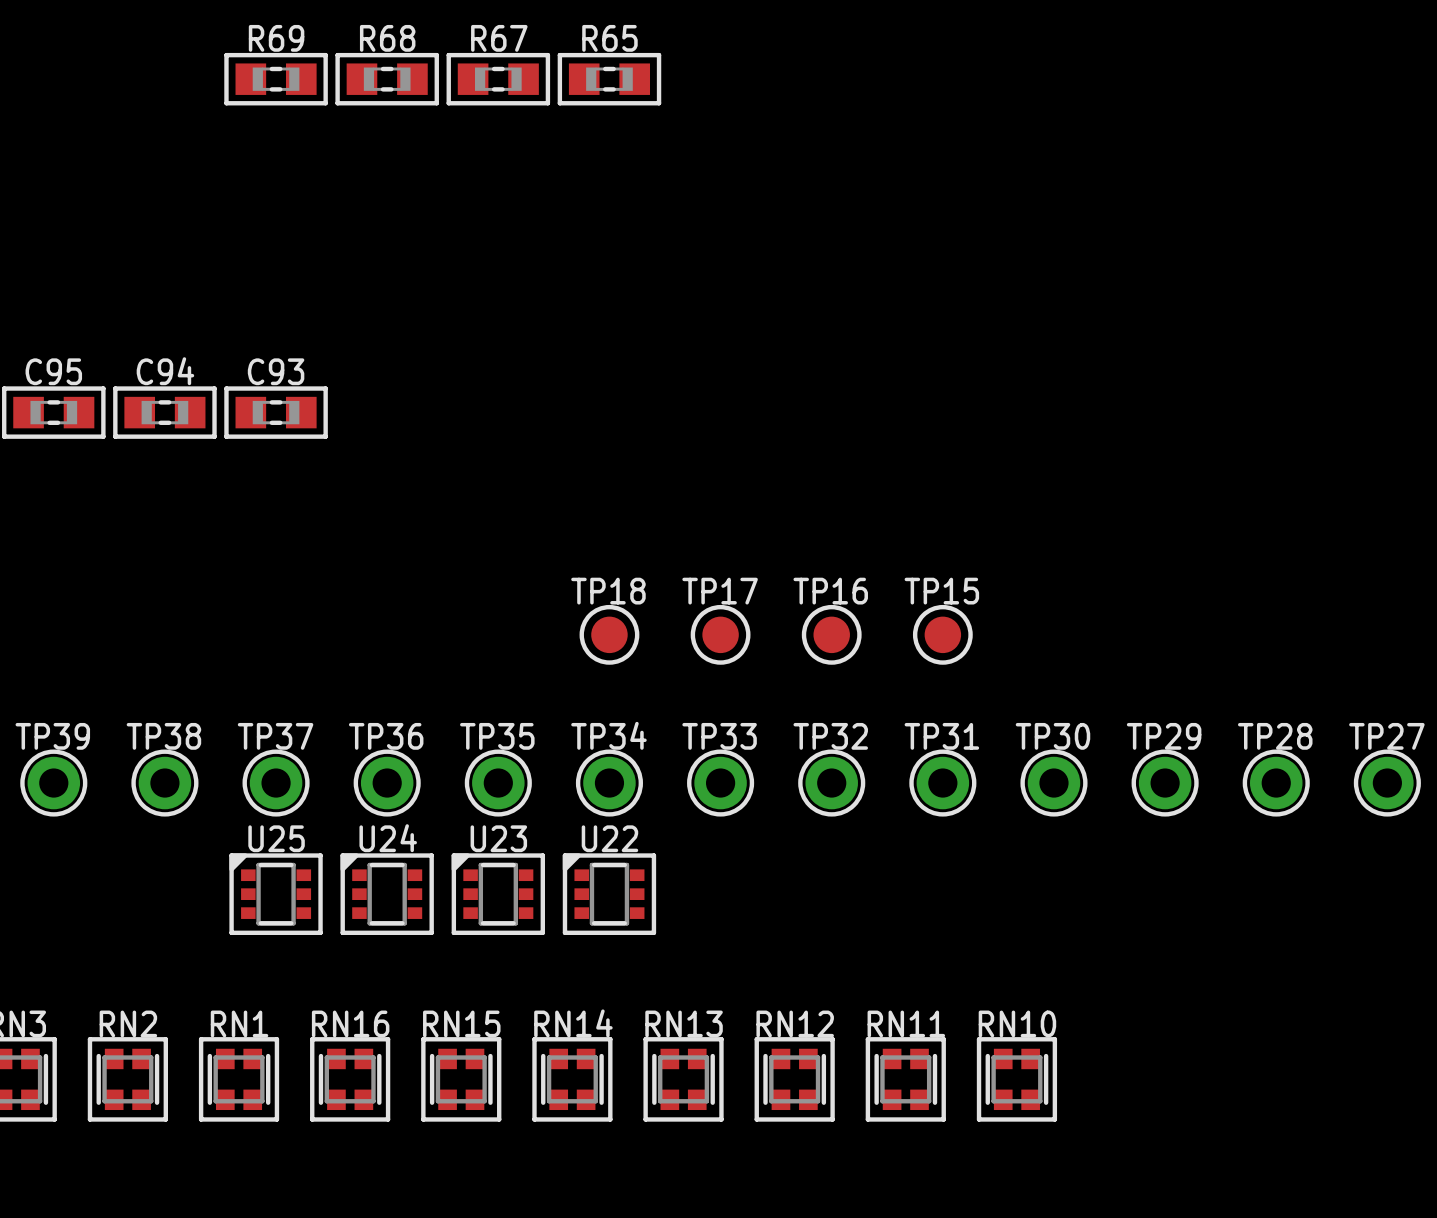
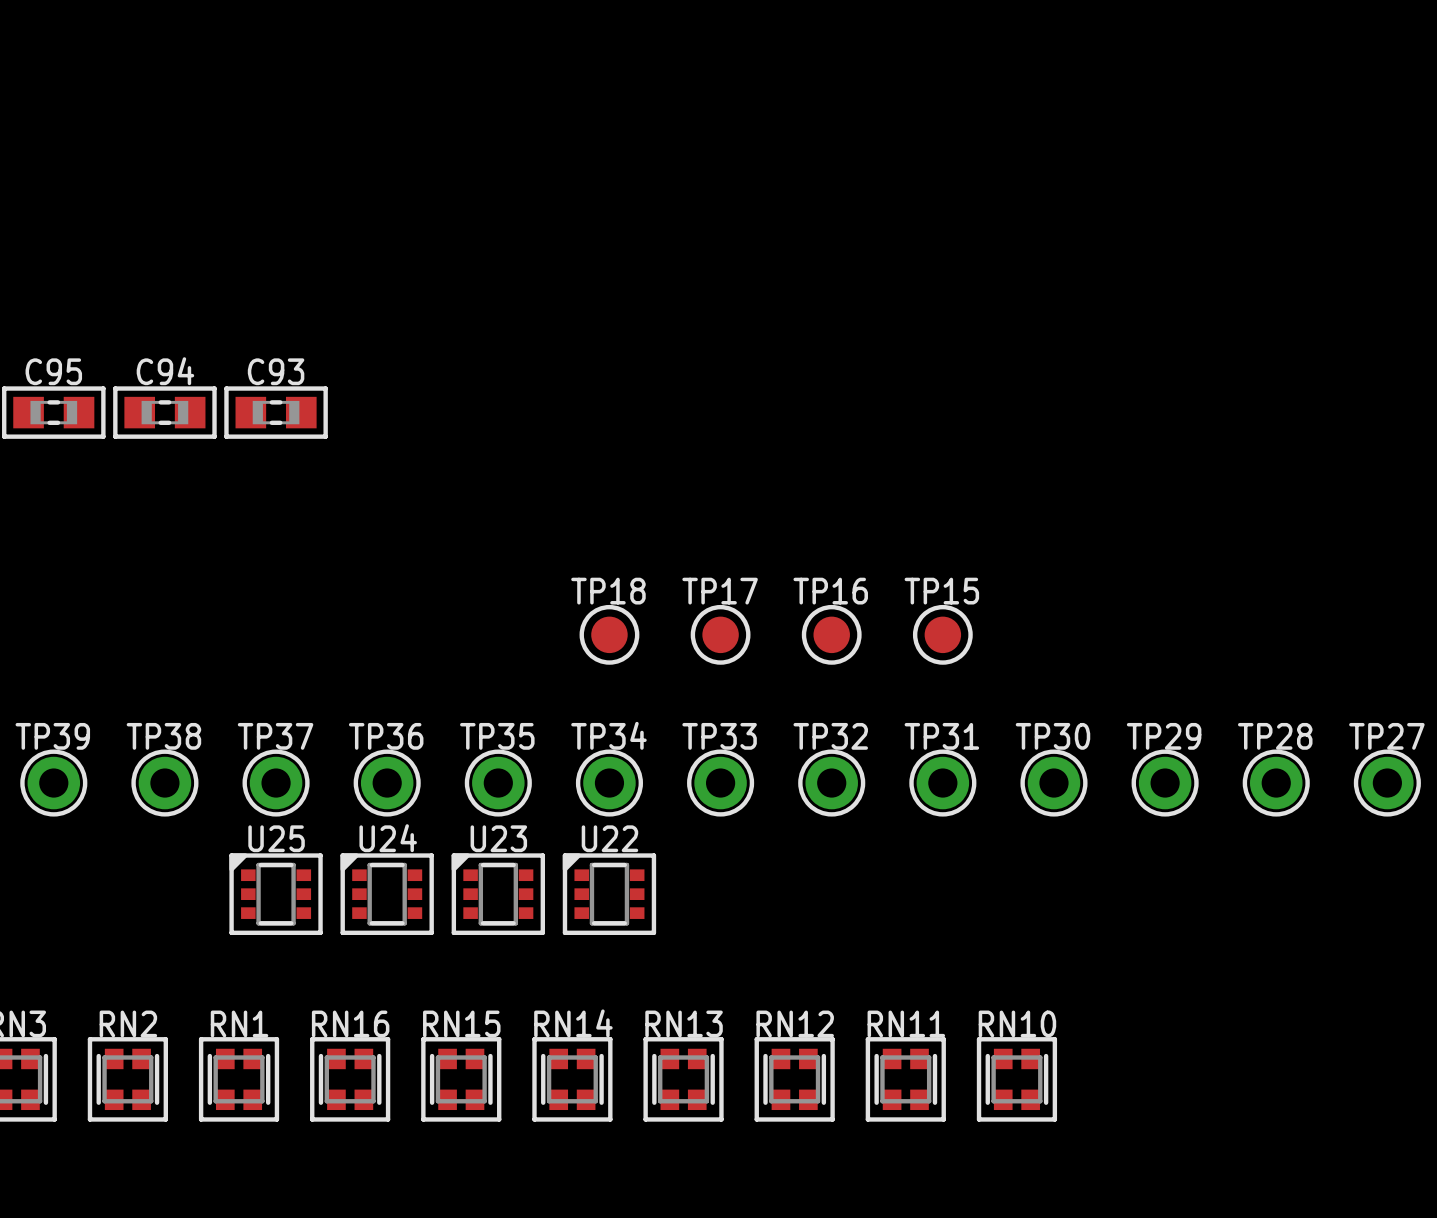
R69: (276, 79) -> none
R68: (387, 79) -> none
R67: (498, 79) -> none
R65: (609, 79) -> none

